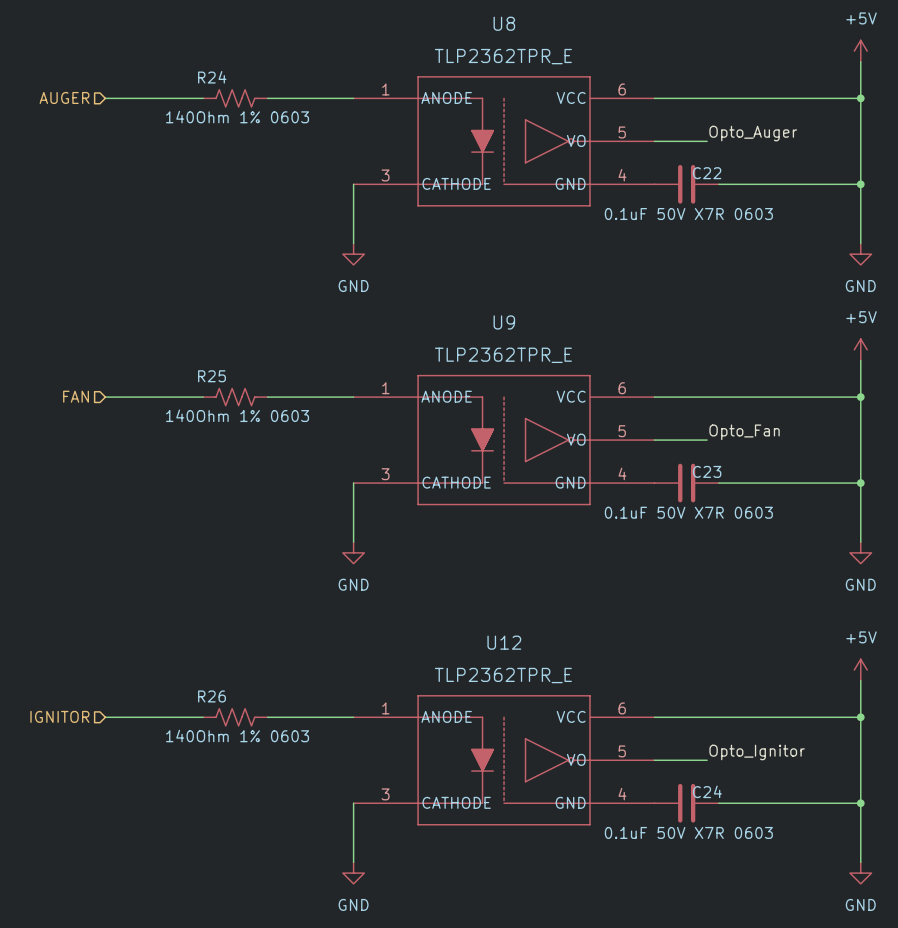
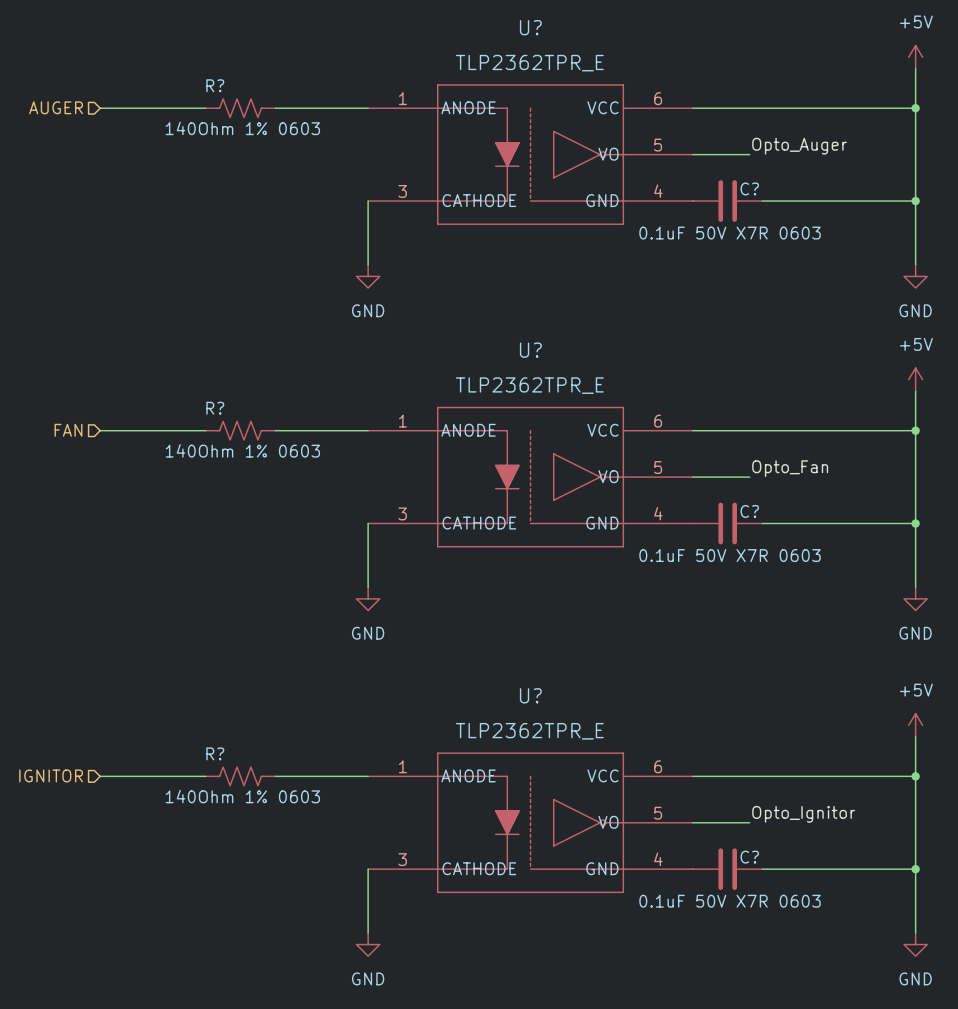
U8 name: U8 (504, 23) -> U? (530, 27)
R24 name: R24 (212, 77) -> R? (215, 85)
C22 name: C22 (707, 173) -> C? (749, 188)
U9 name: U9 (504, 322) -> U? (530, 350)
R25 name: R25 (212, 376) -> R? (215, 408)
C23 name: C23 (707, 471) -> C? (749, 511)
U12 name: U12 (504, 642) -> U? (530, 695)
R26 name: R26 (212, 696) -> R? (215, 753)
C24 name: C24 (707, 791) -> C? (749, 857)

